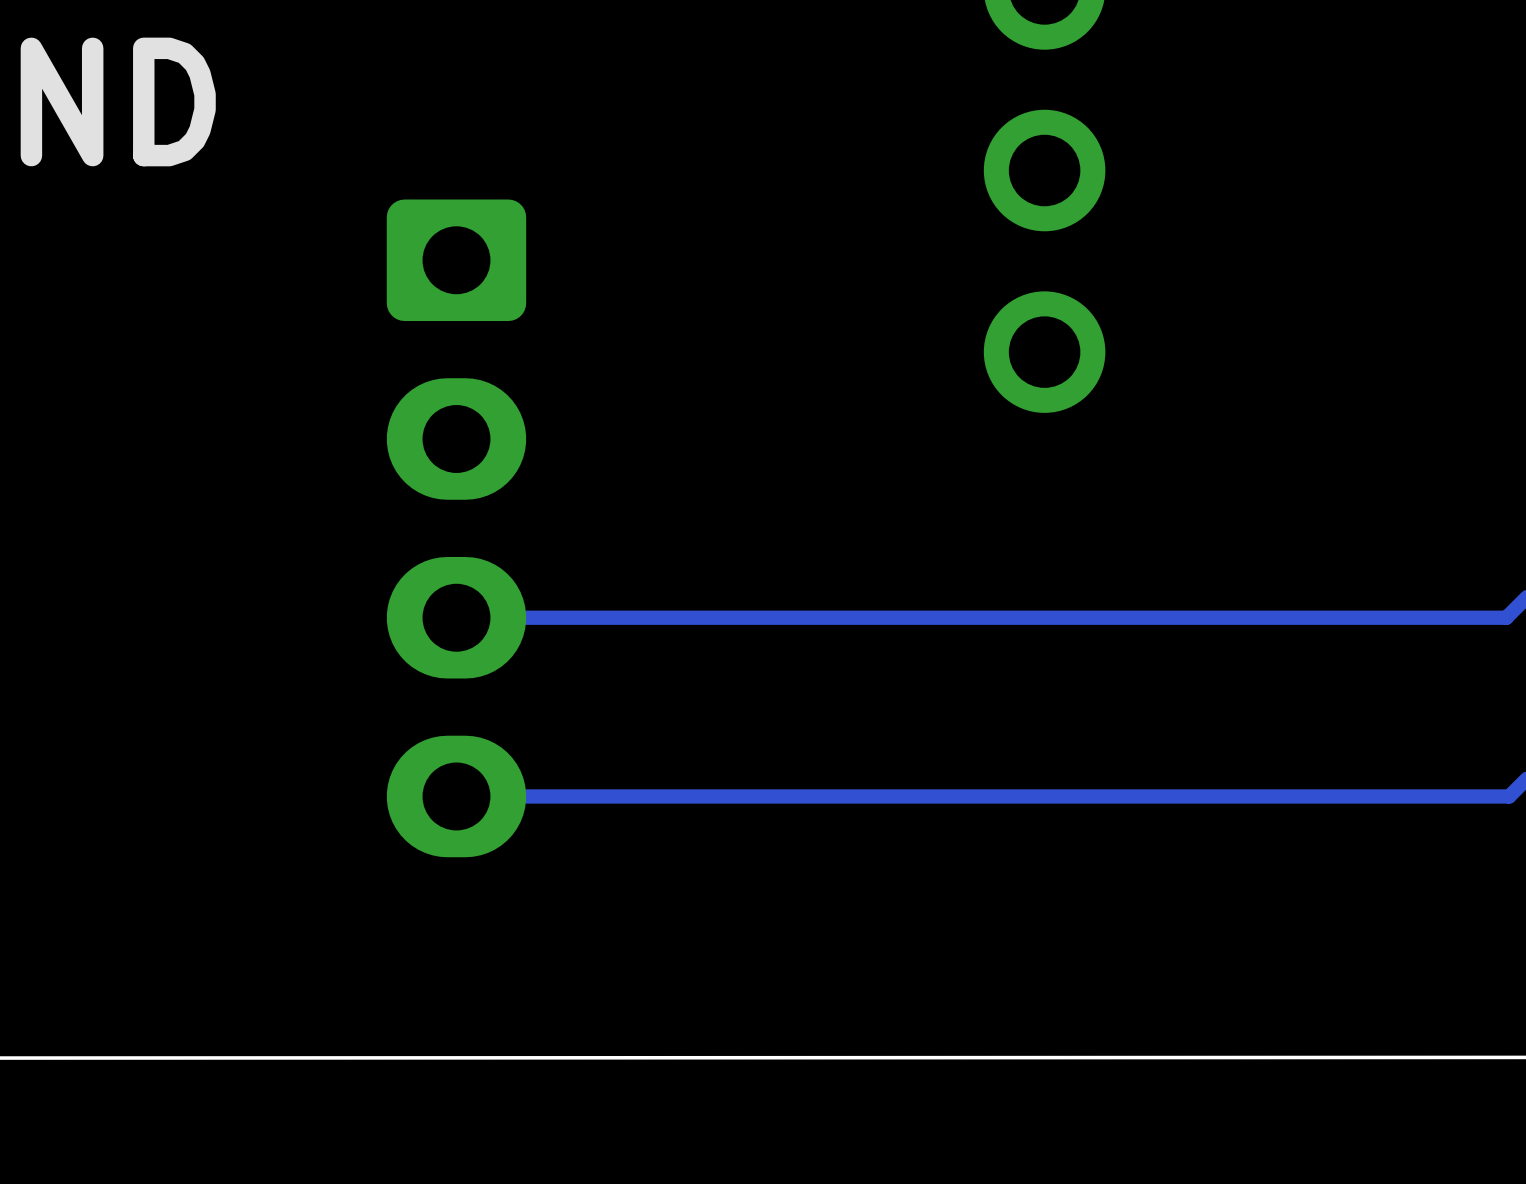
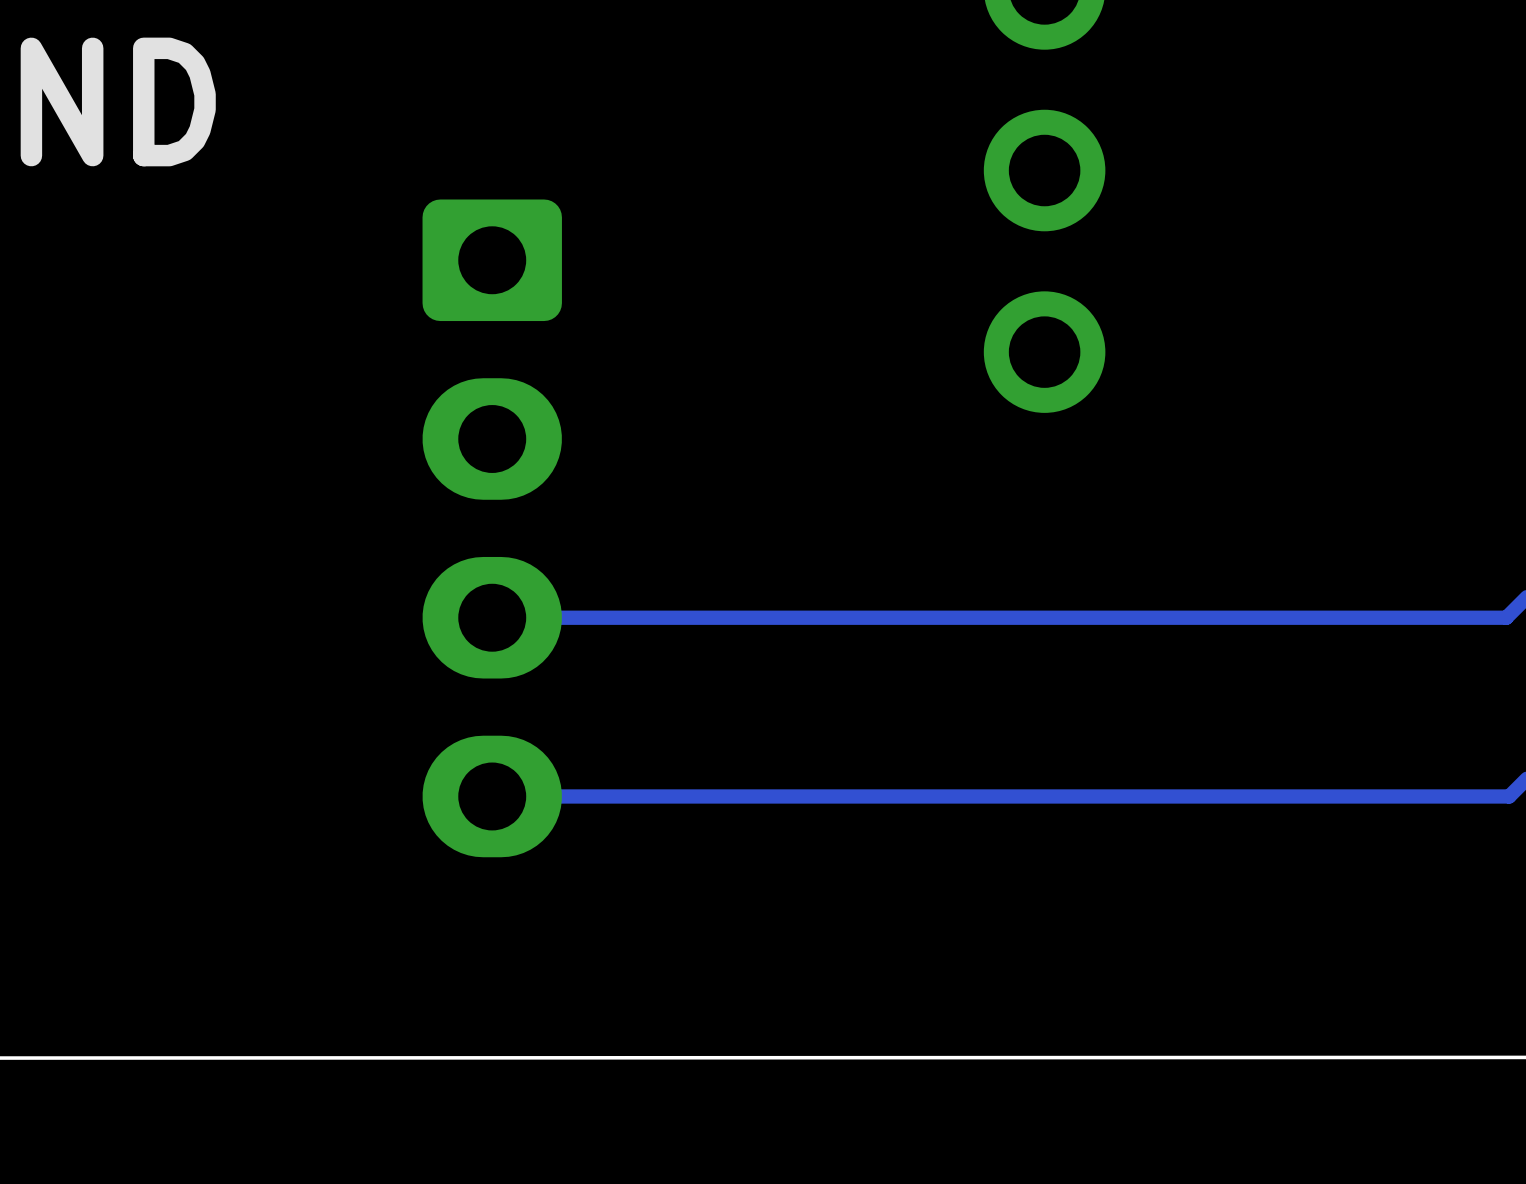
part position: (456, 528) -> (492, 528)

